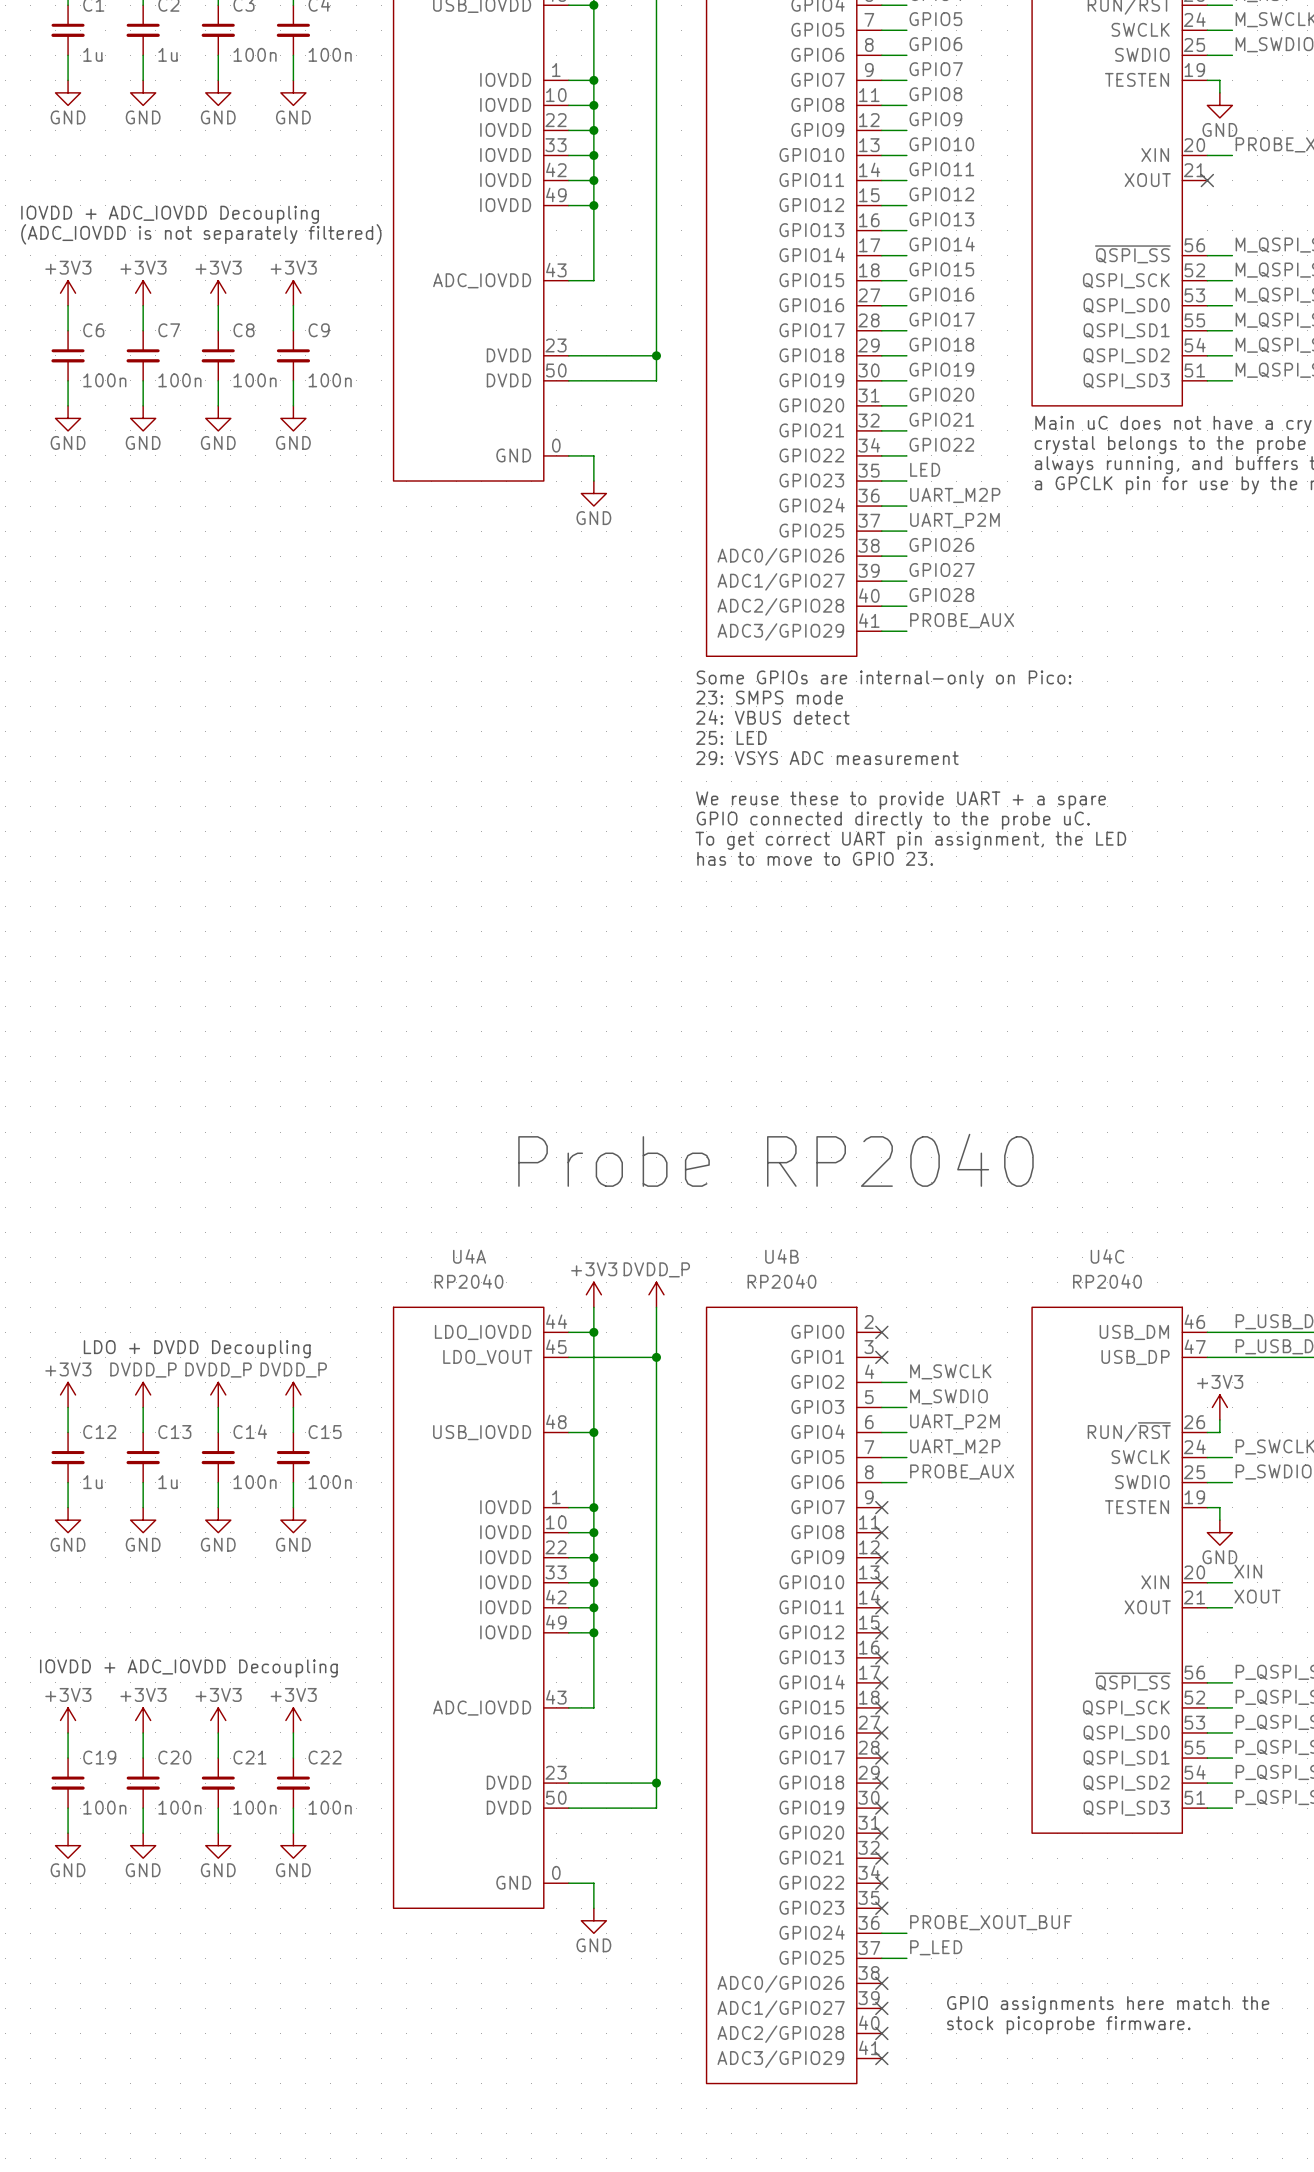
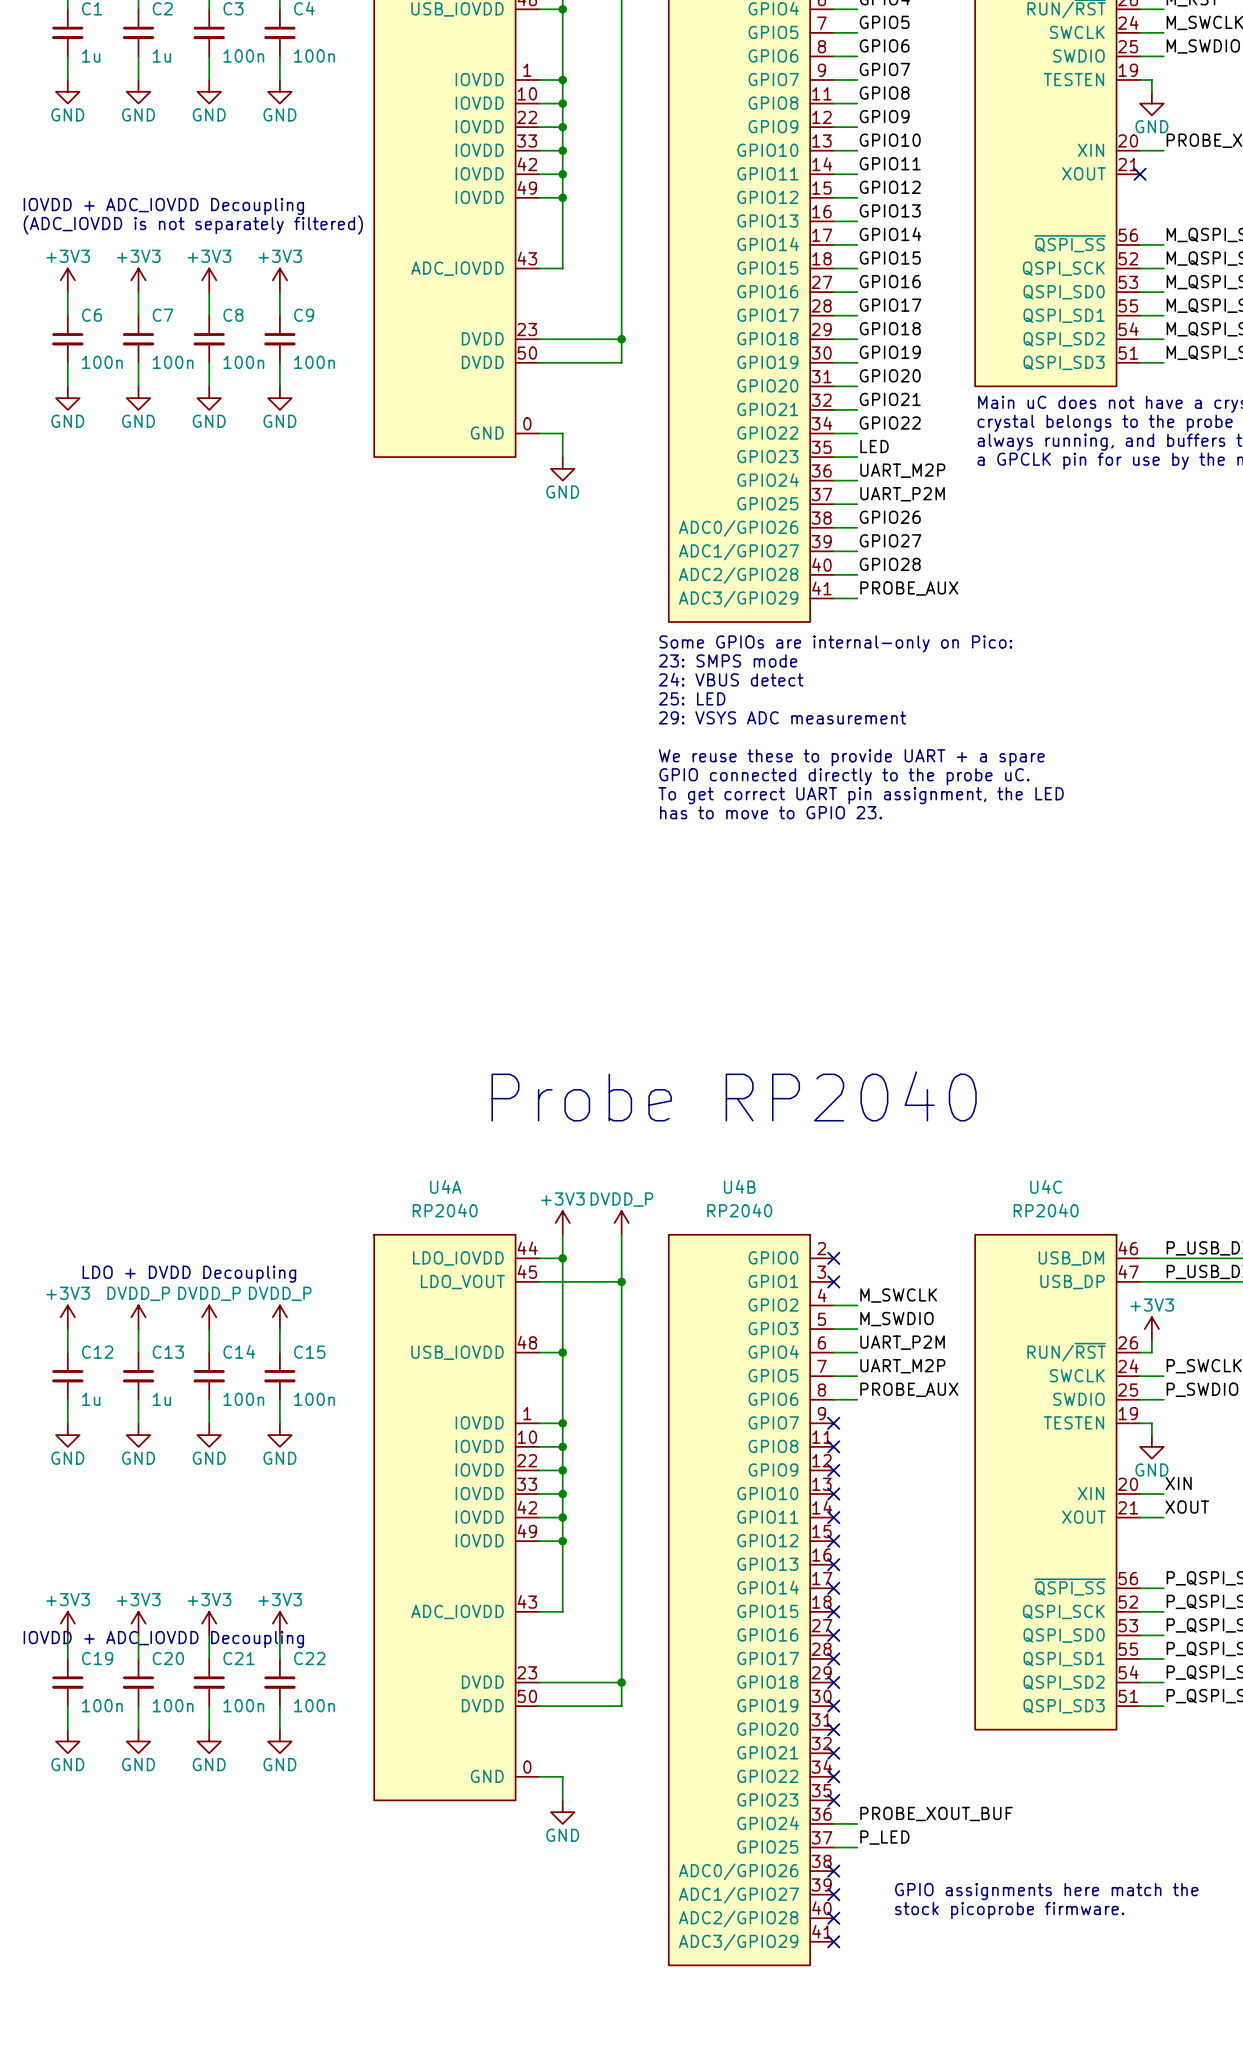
text position: IOVDD + ADC_IOVDD Decoupling (188, 1668) -> IOVDD + ADC_IOVDD Decoupling (163, 1639)

